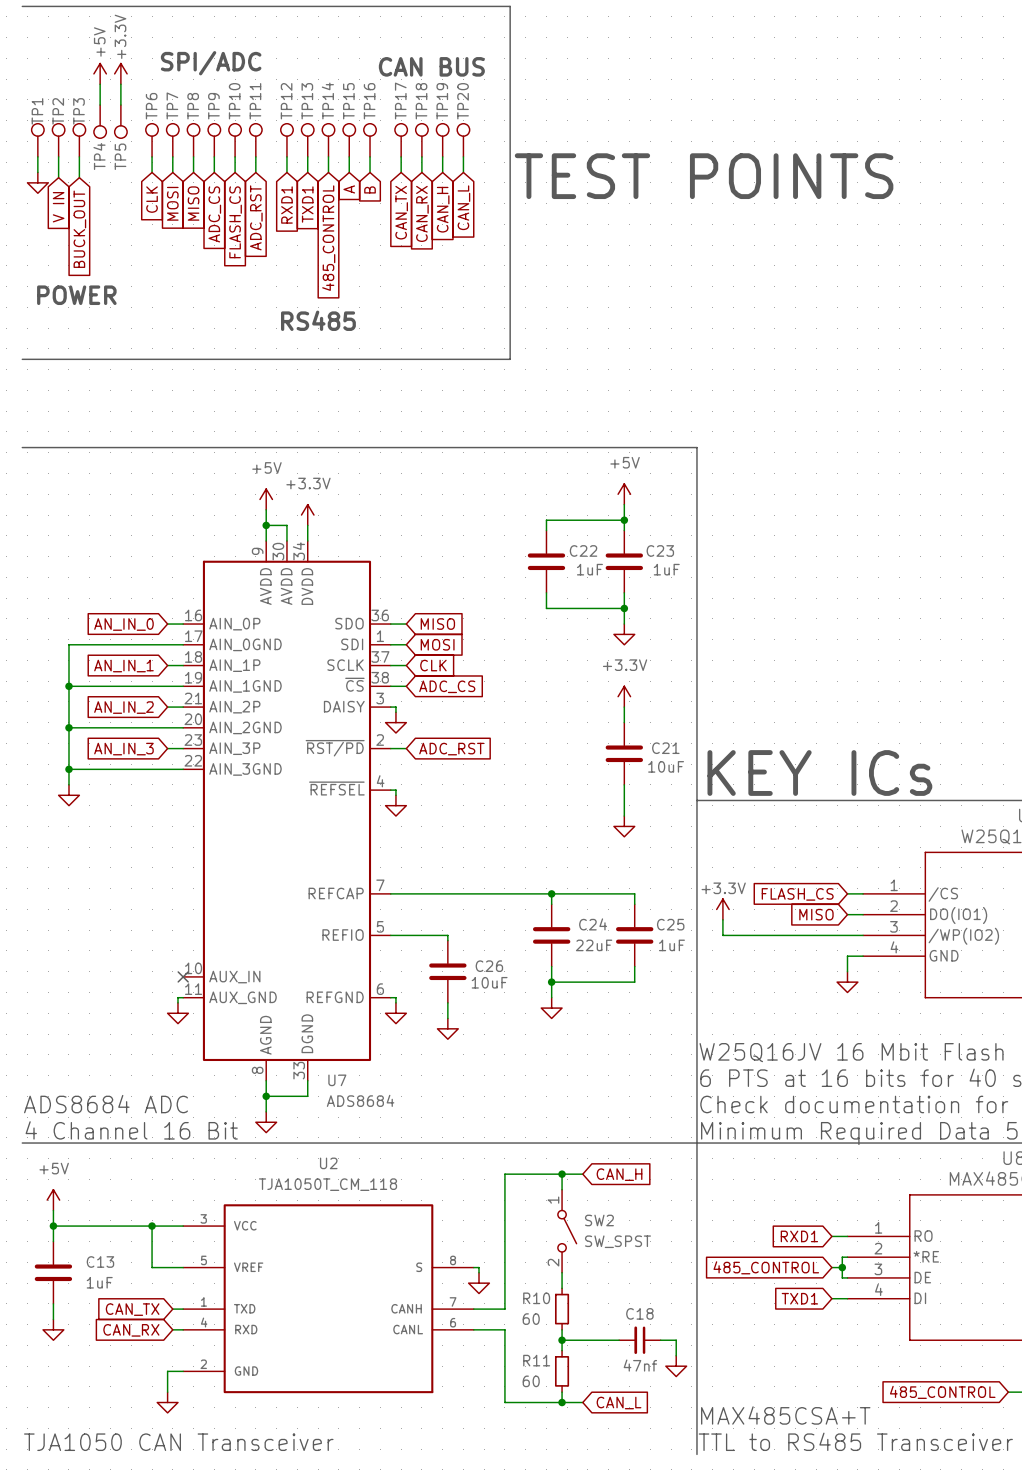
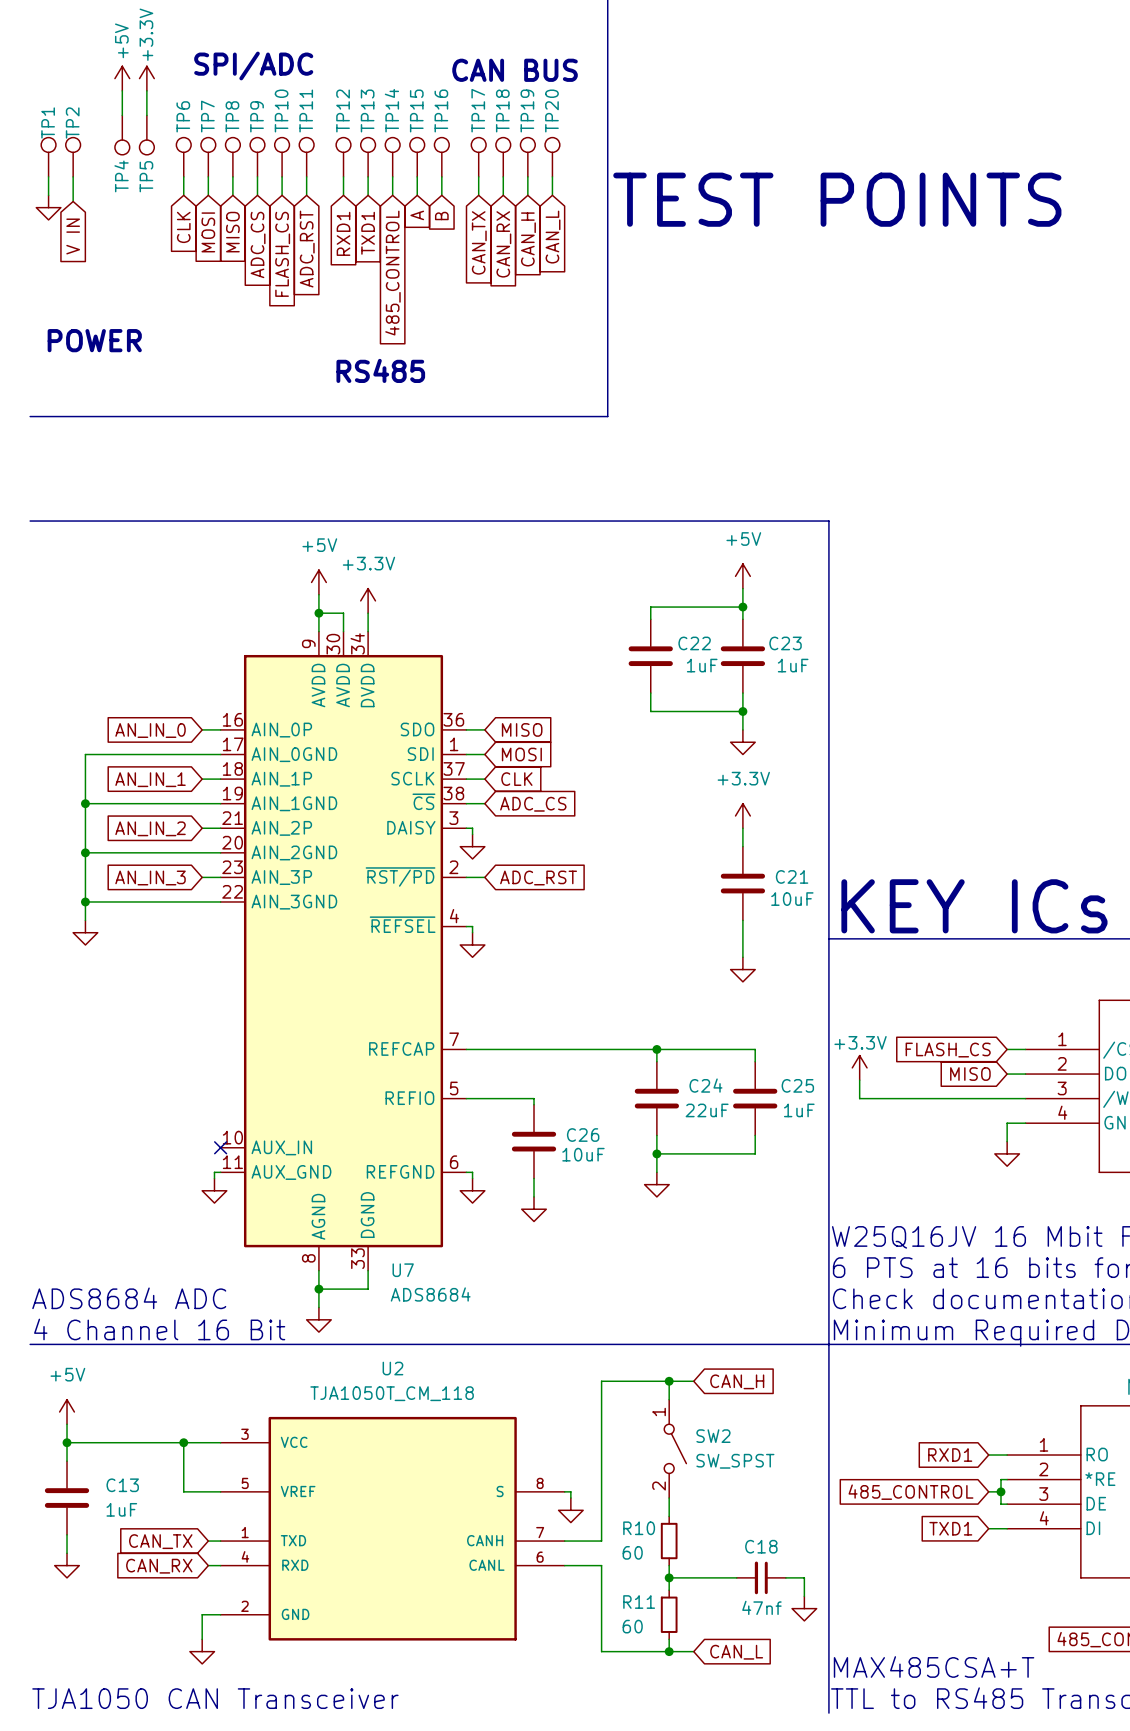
TP3: (79, 140) -> none
wire: (79, 156) (79, 177) -> none
global label: BUCK_OUT (79, 229) -> none

